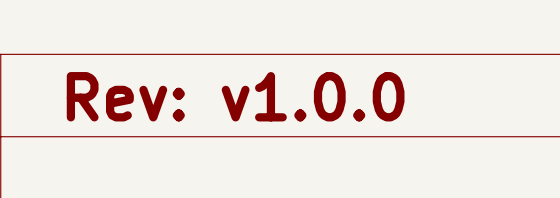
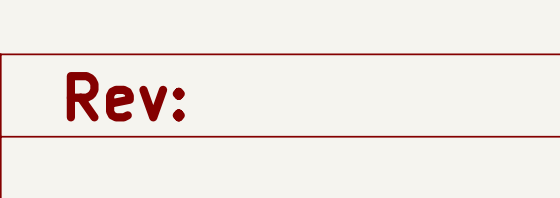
title block: Rev: v1.0.0 (235, 96) -> Rev: (125, 96)

